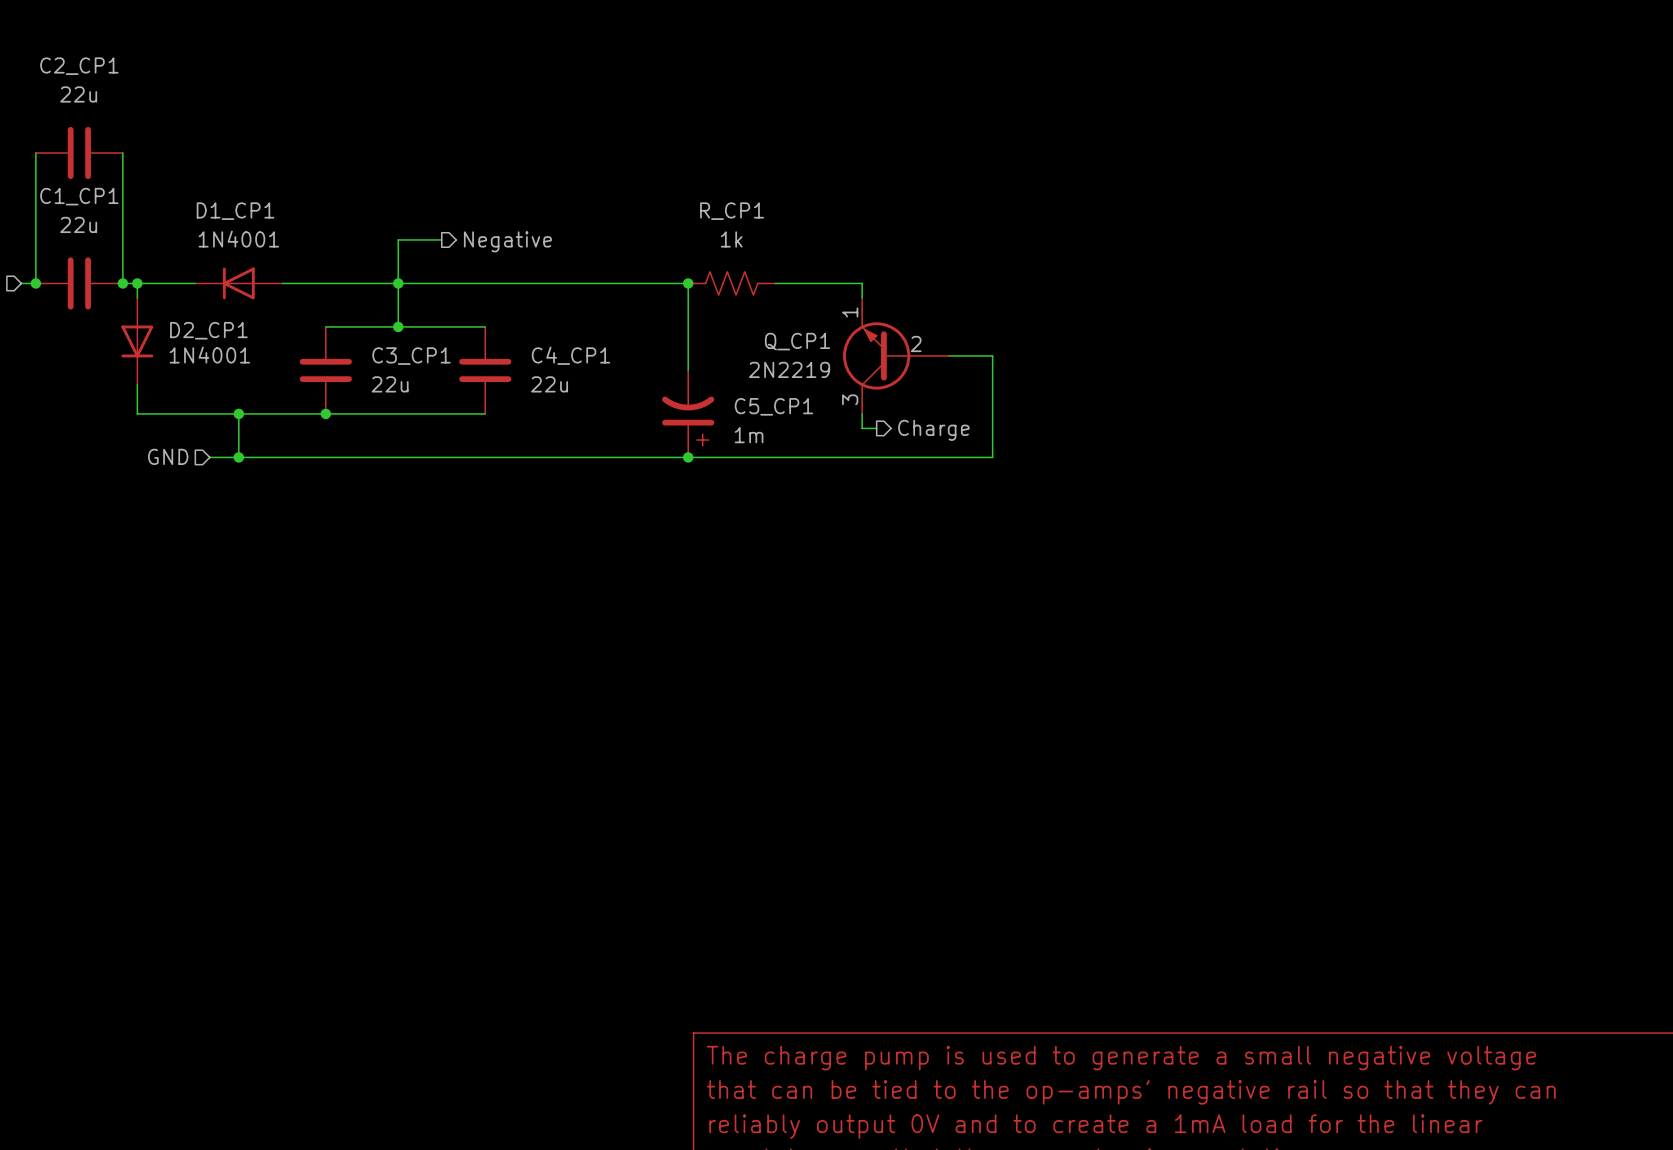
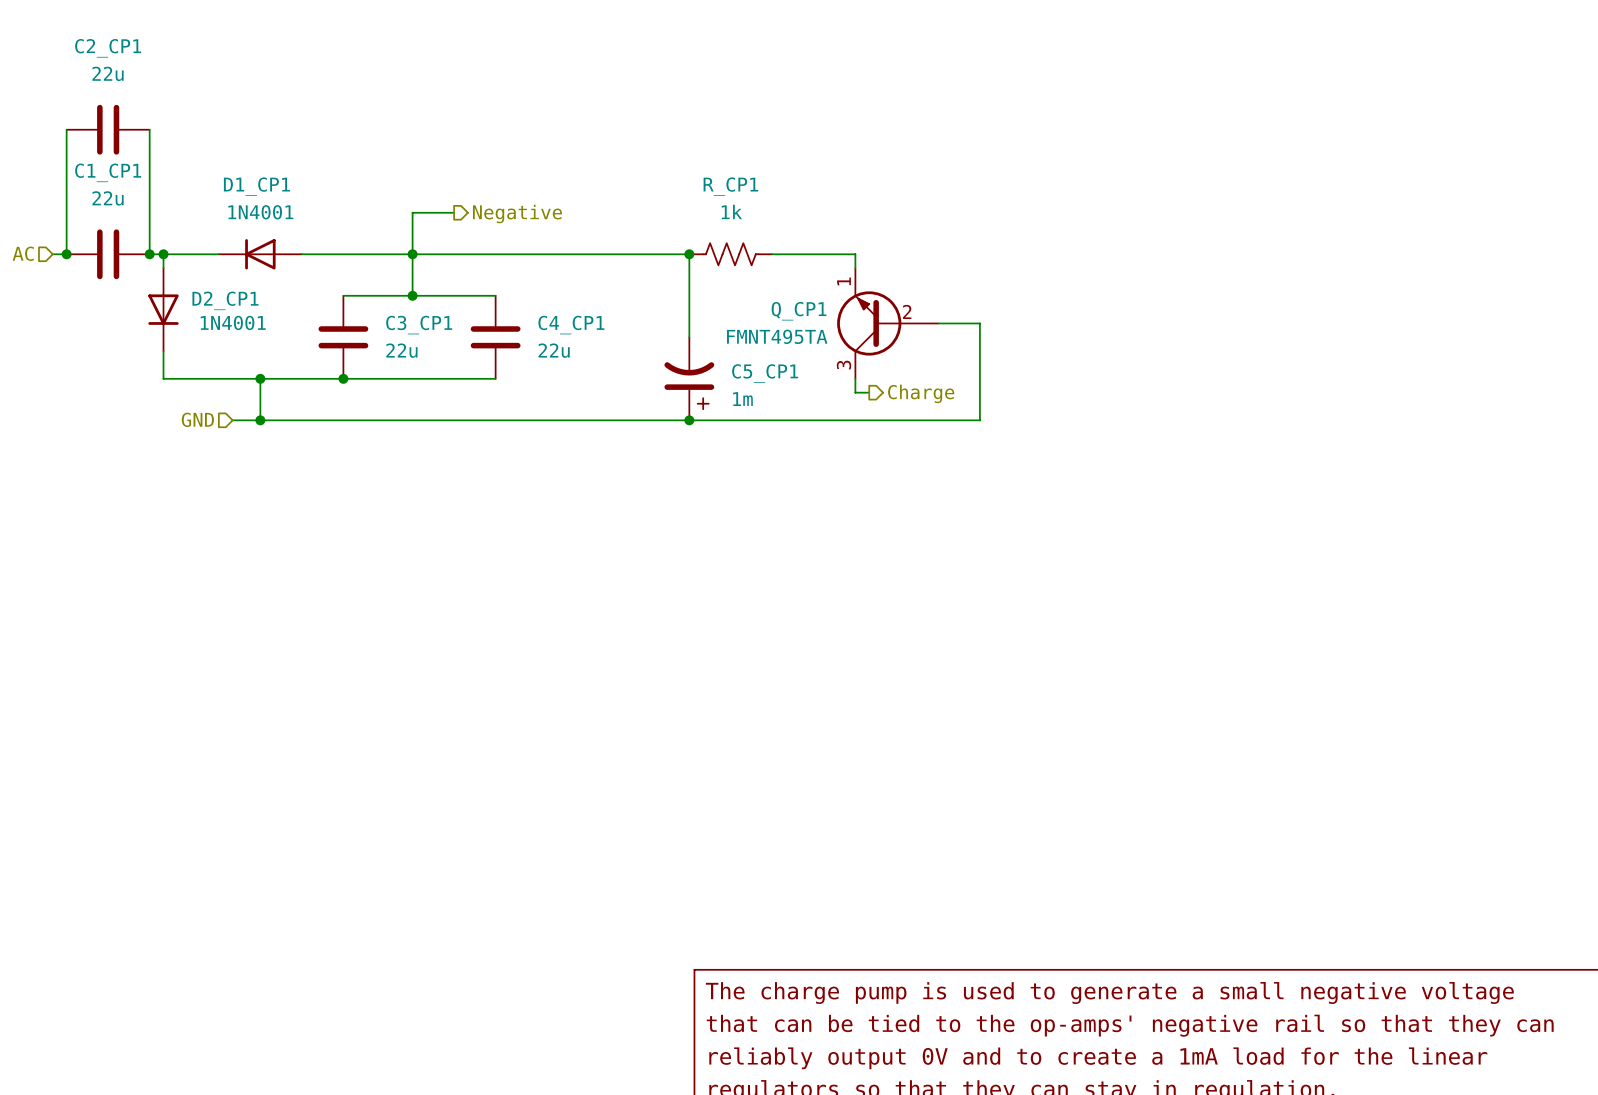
Q_CP1 value: 2N2219 (789, 369) -> FMNT495TA (777, 336)

